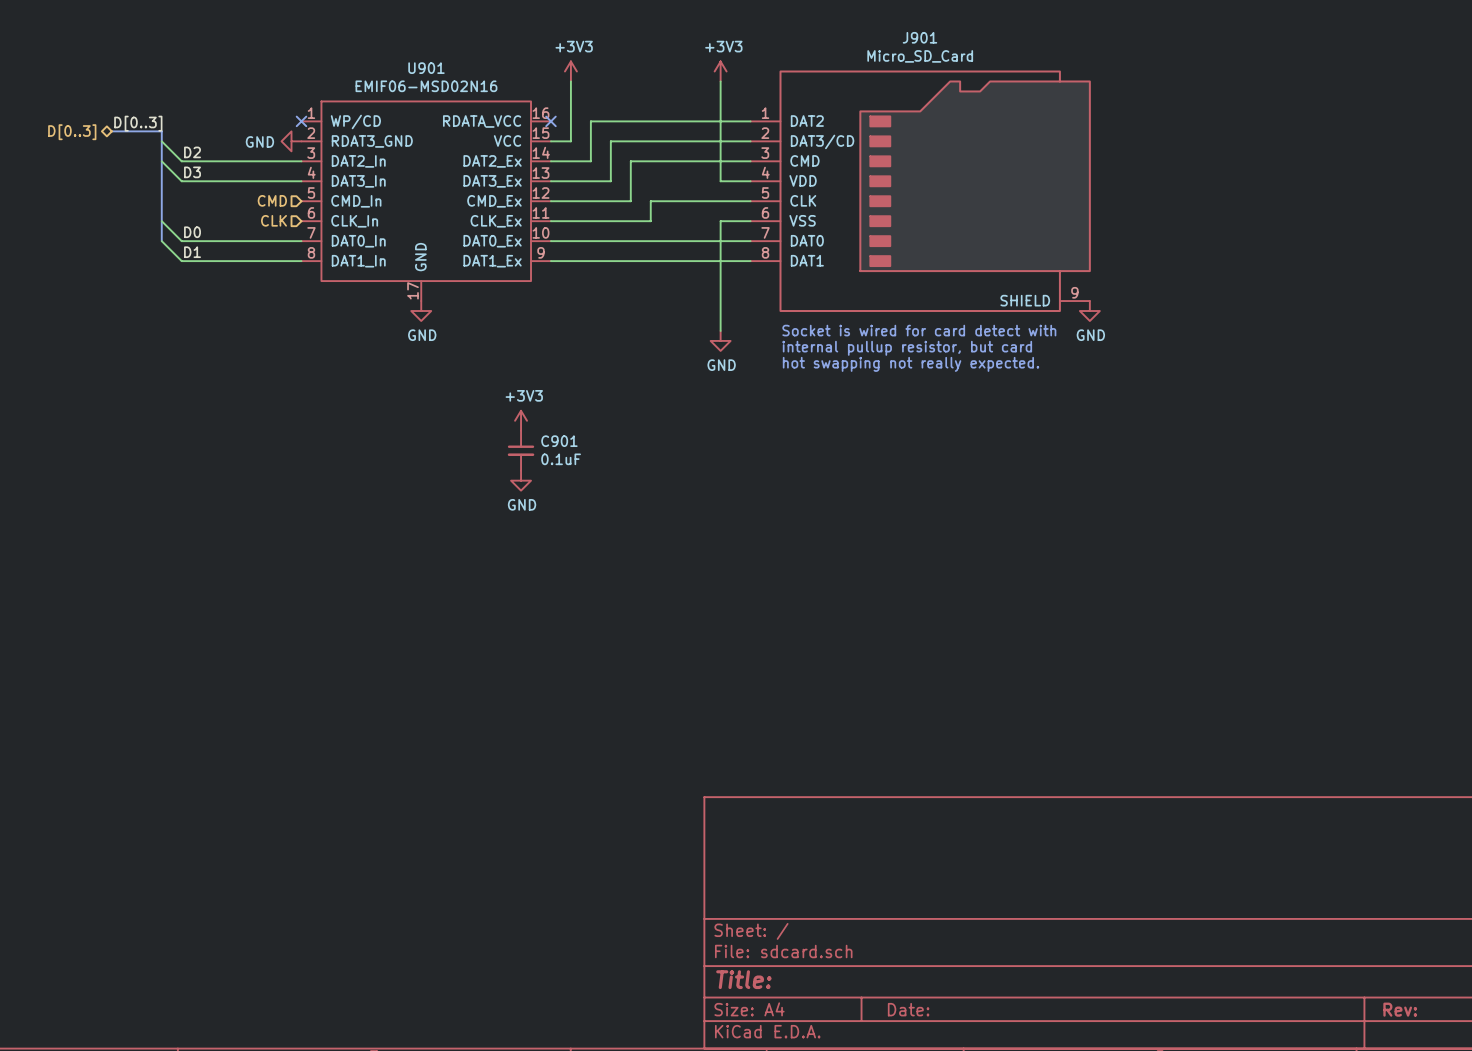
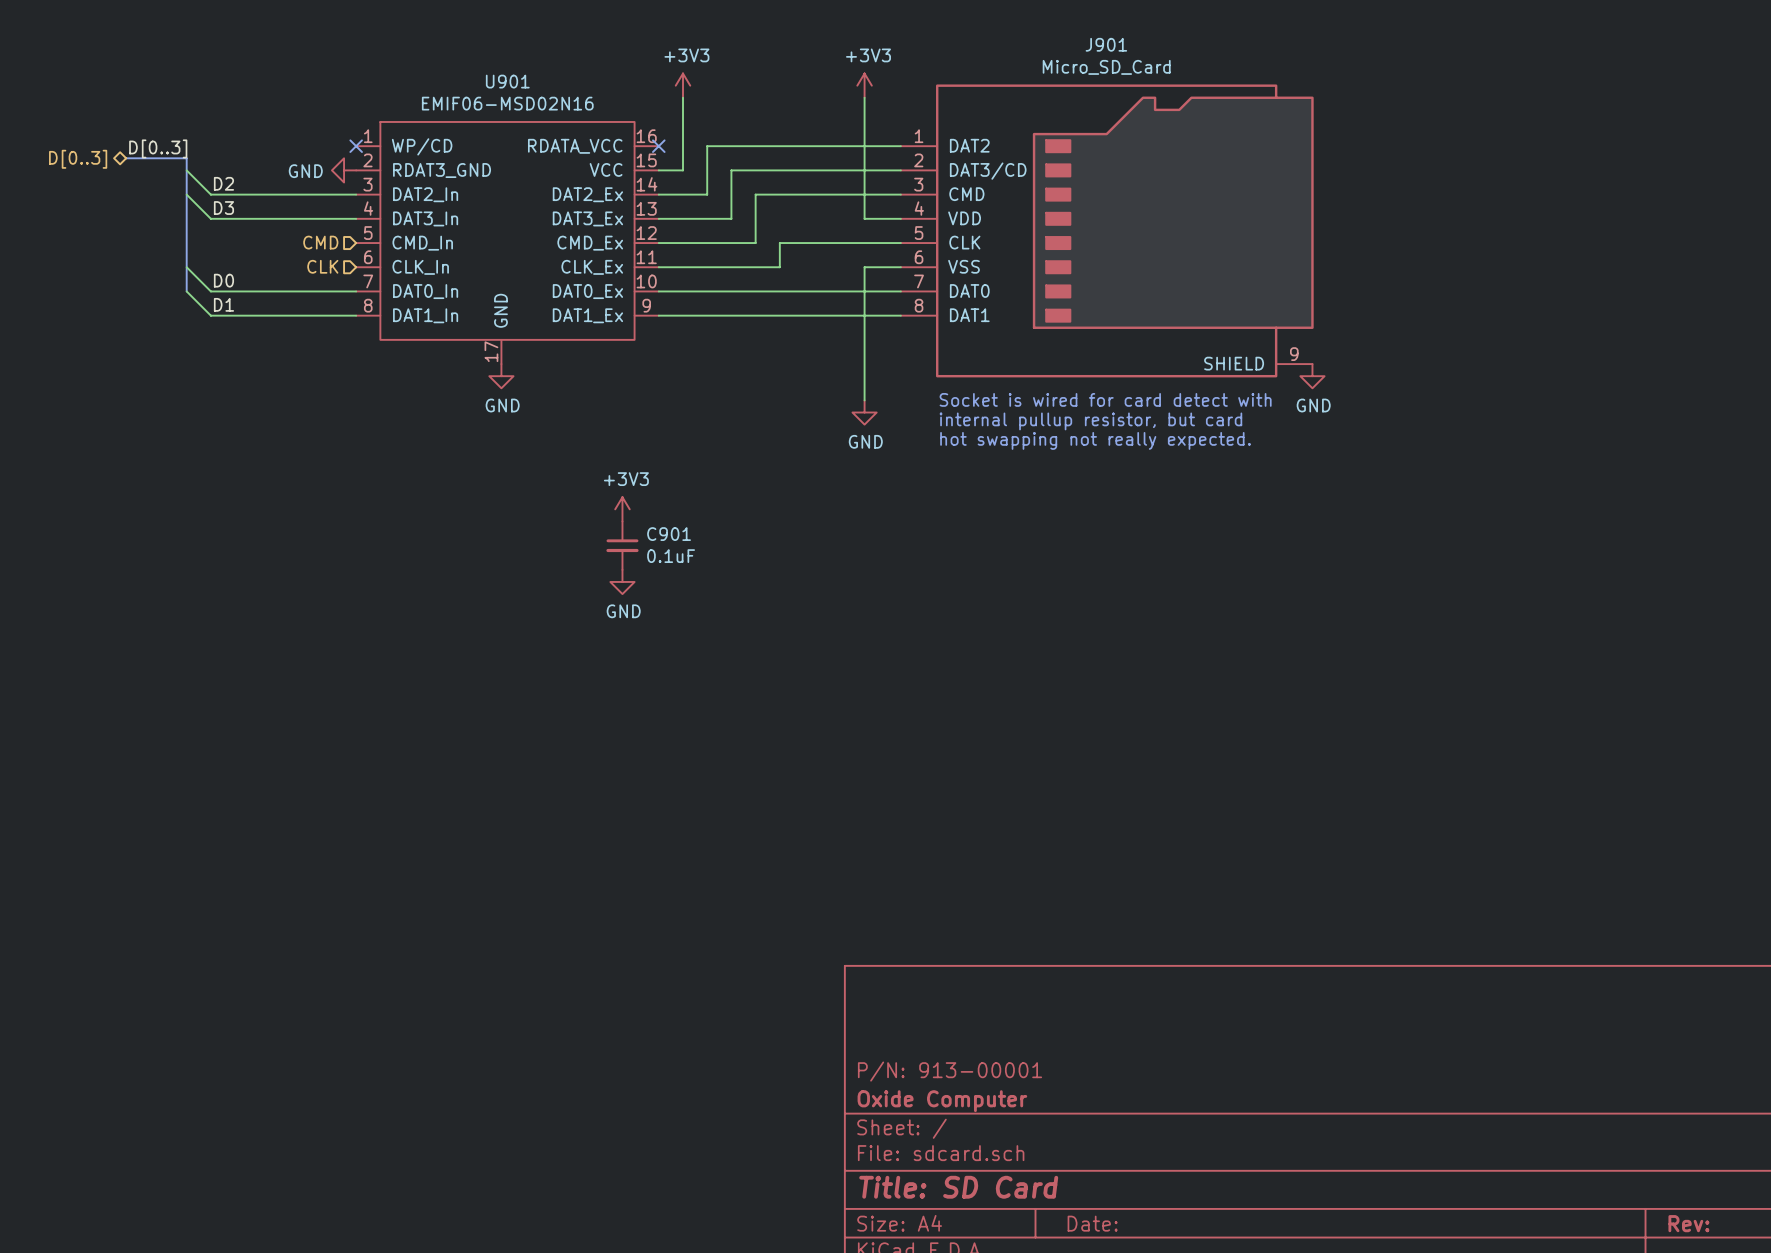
title block: none -> P/N: 913-00001 (949, 1071)
title block: none -> Oxide Computer (942, 1101)
title block: Title: (743, 979) -> Title: SD Card (958, 1187)

